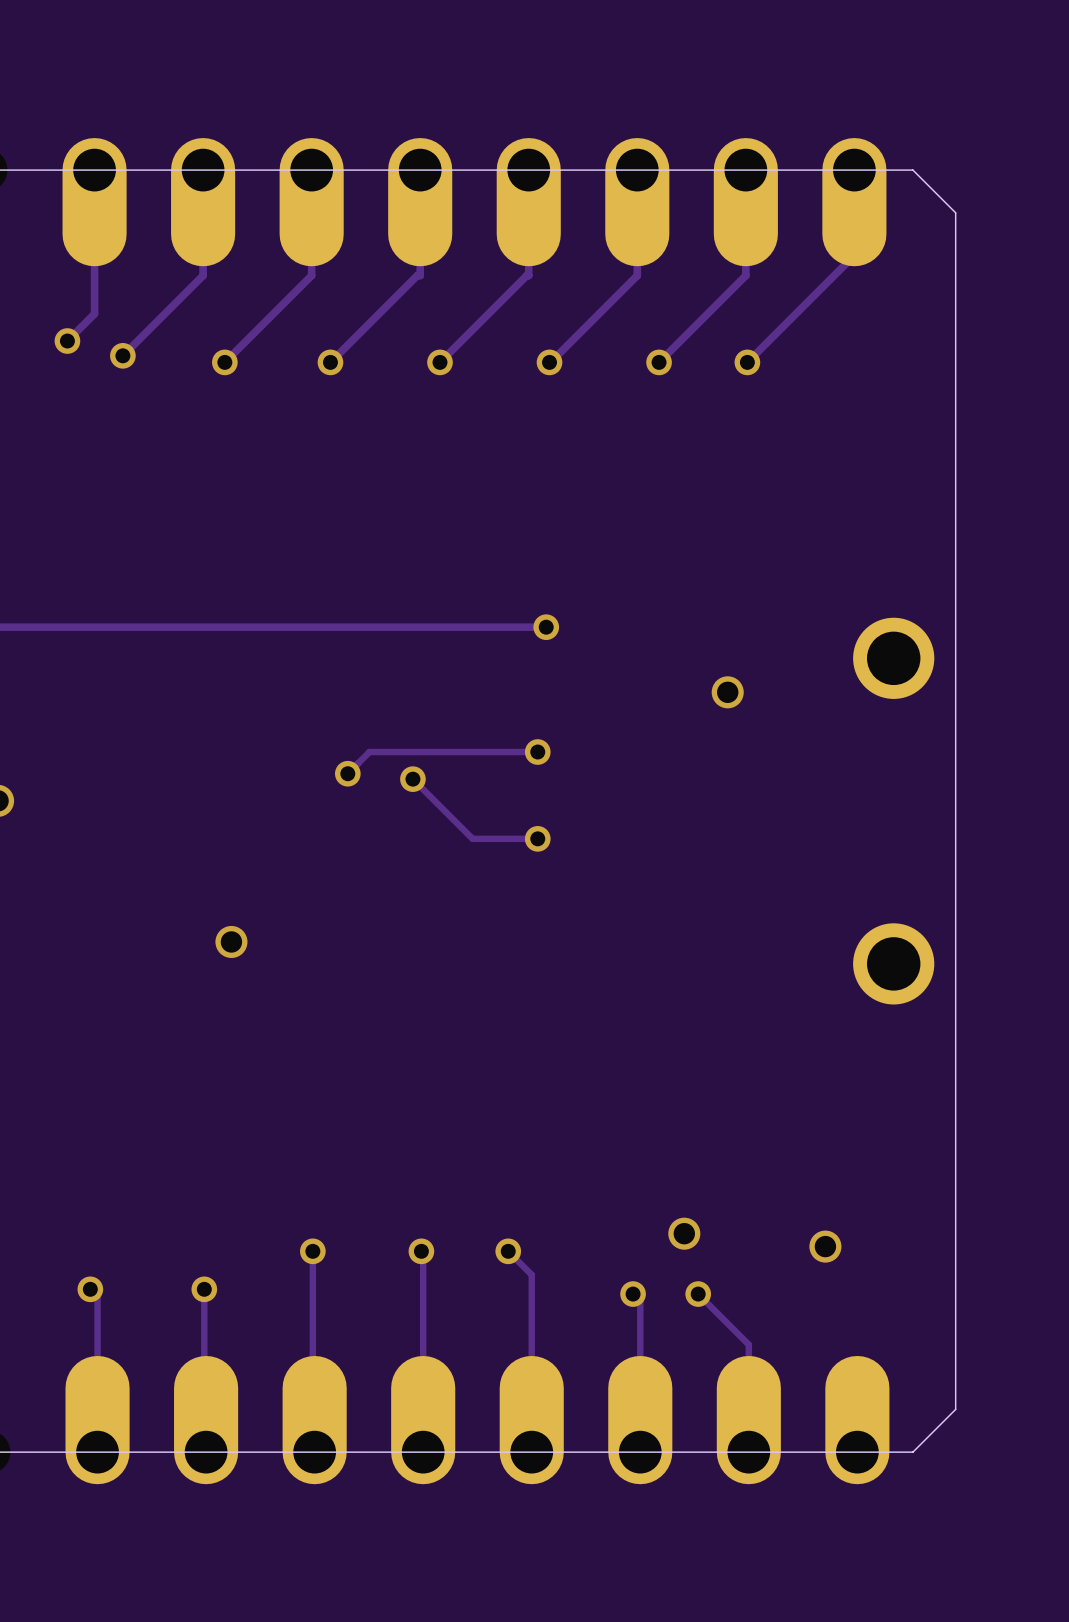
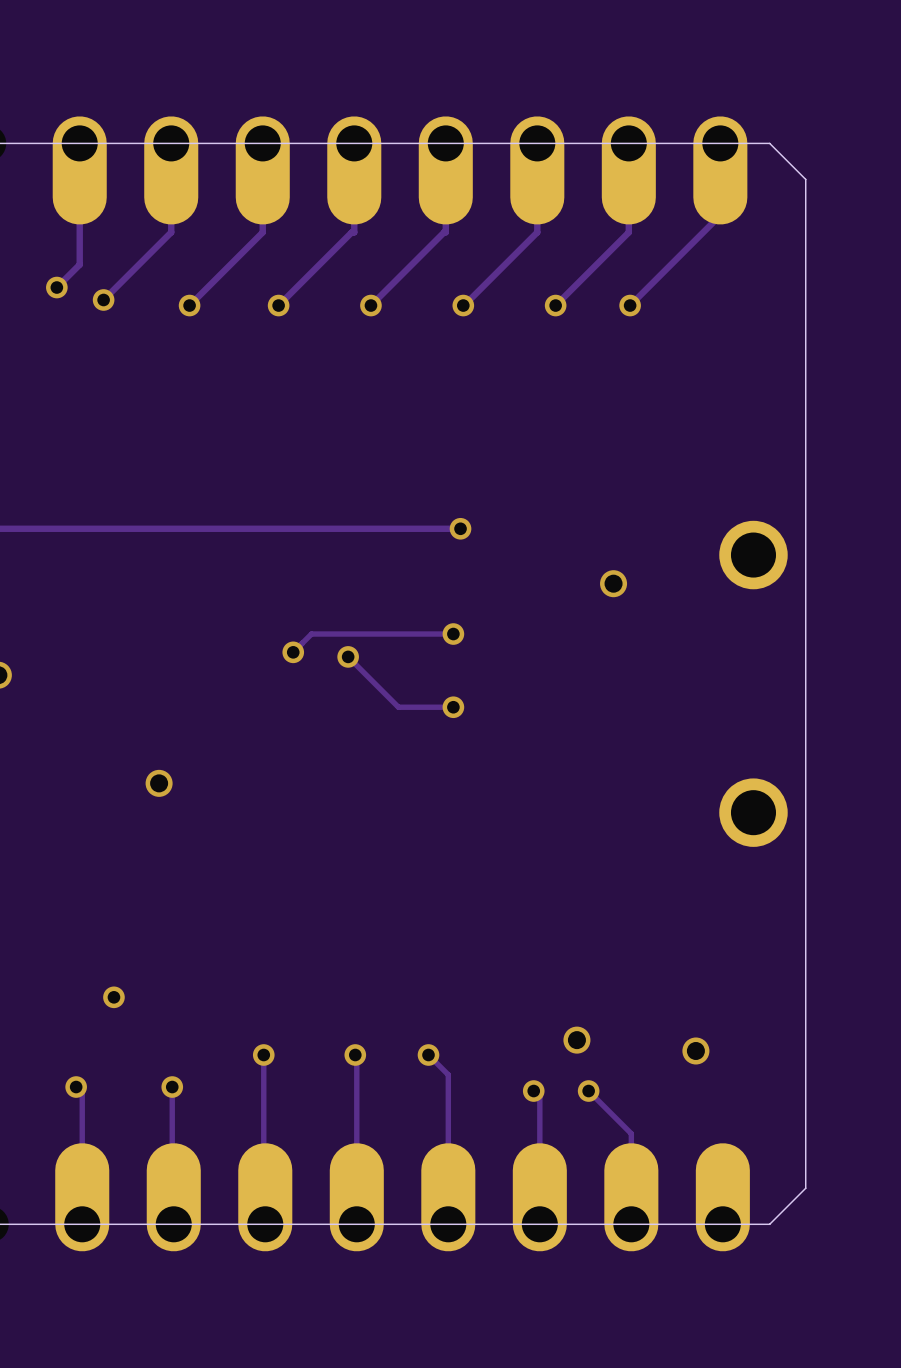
via position: (231, 941) -> (159, 783)
via: none -> (113, 997)

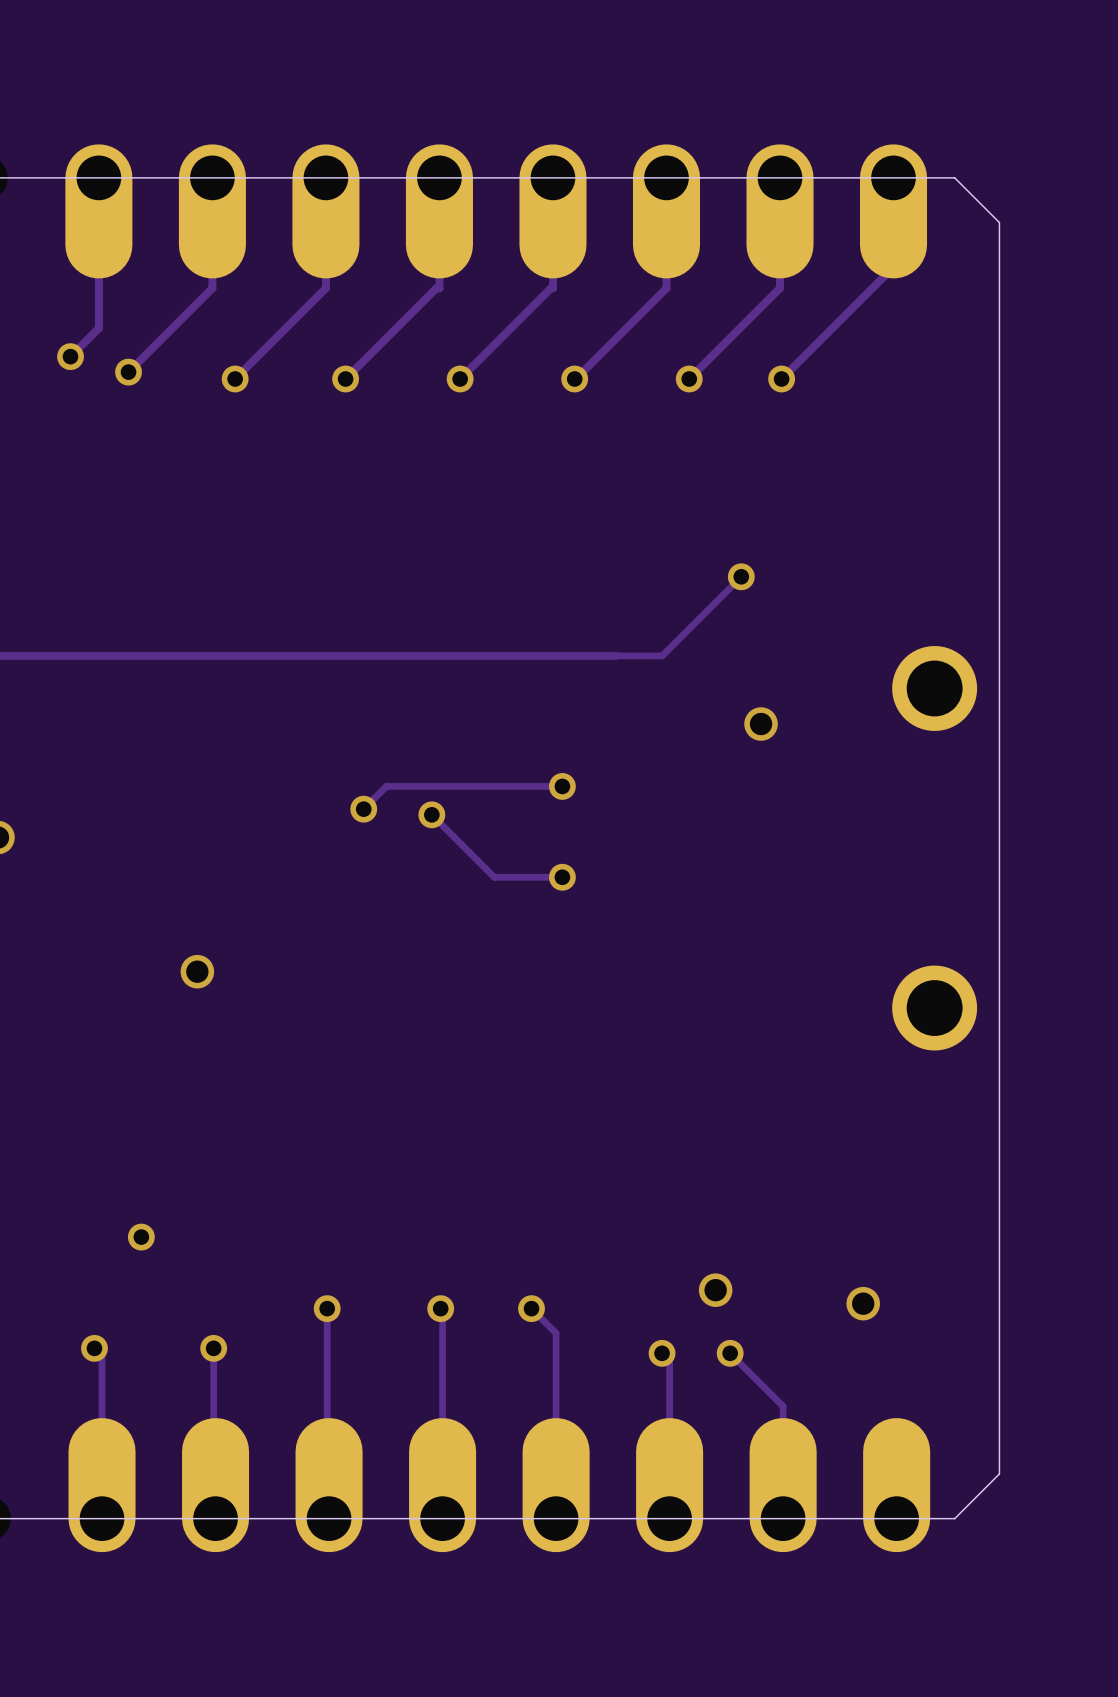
track: none -> (741, 576) (662, 655) (571, 655)
via position: (460, 528) -> (741, 576)

